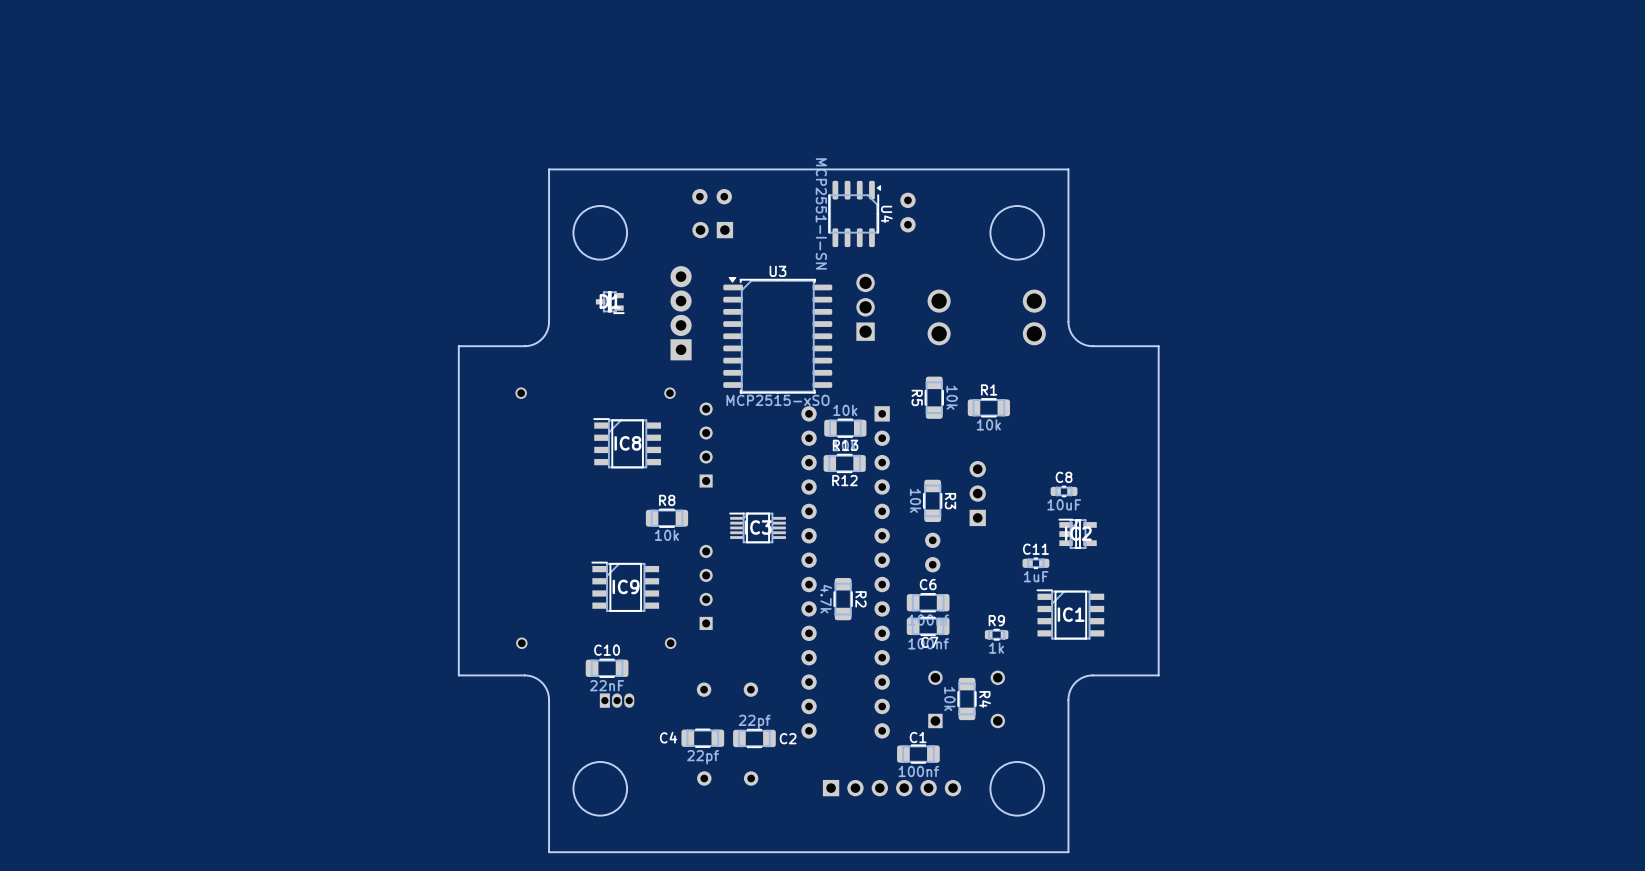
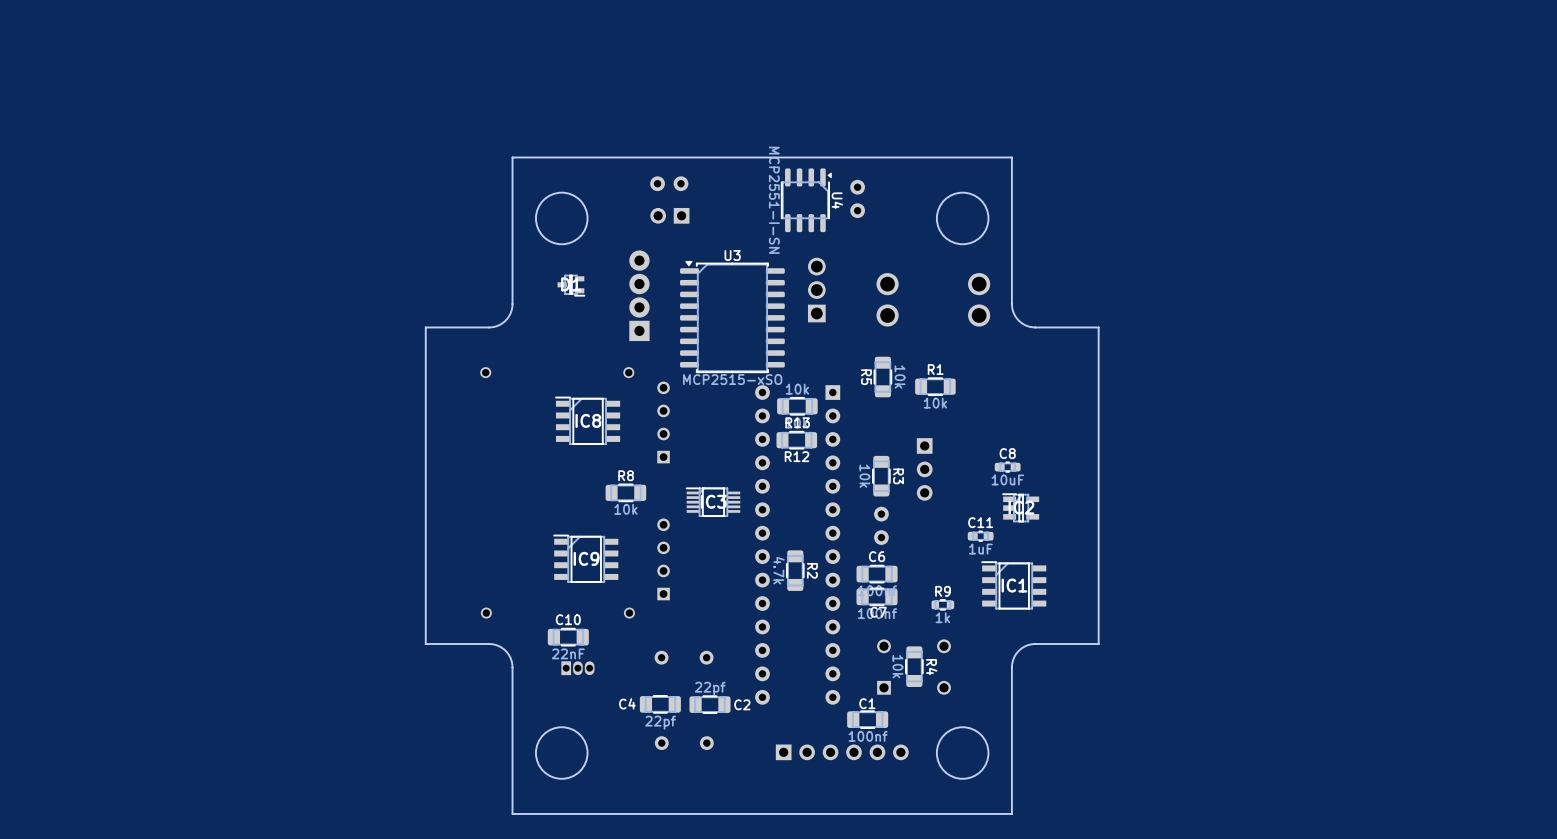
part rotation: 0° (977, 493) -> 180° (924, 469)

